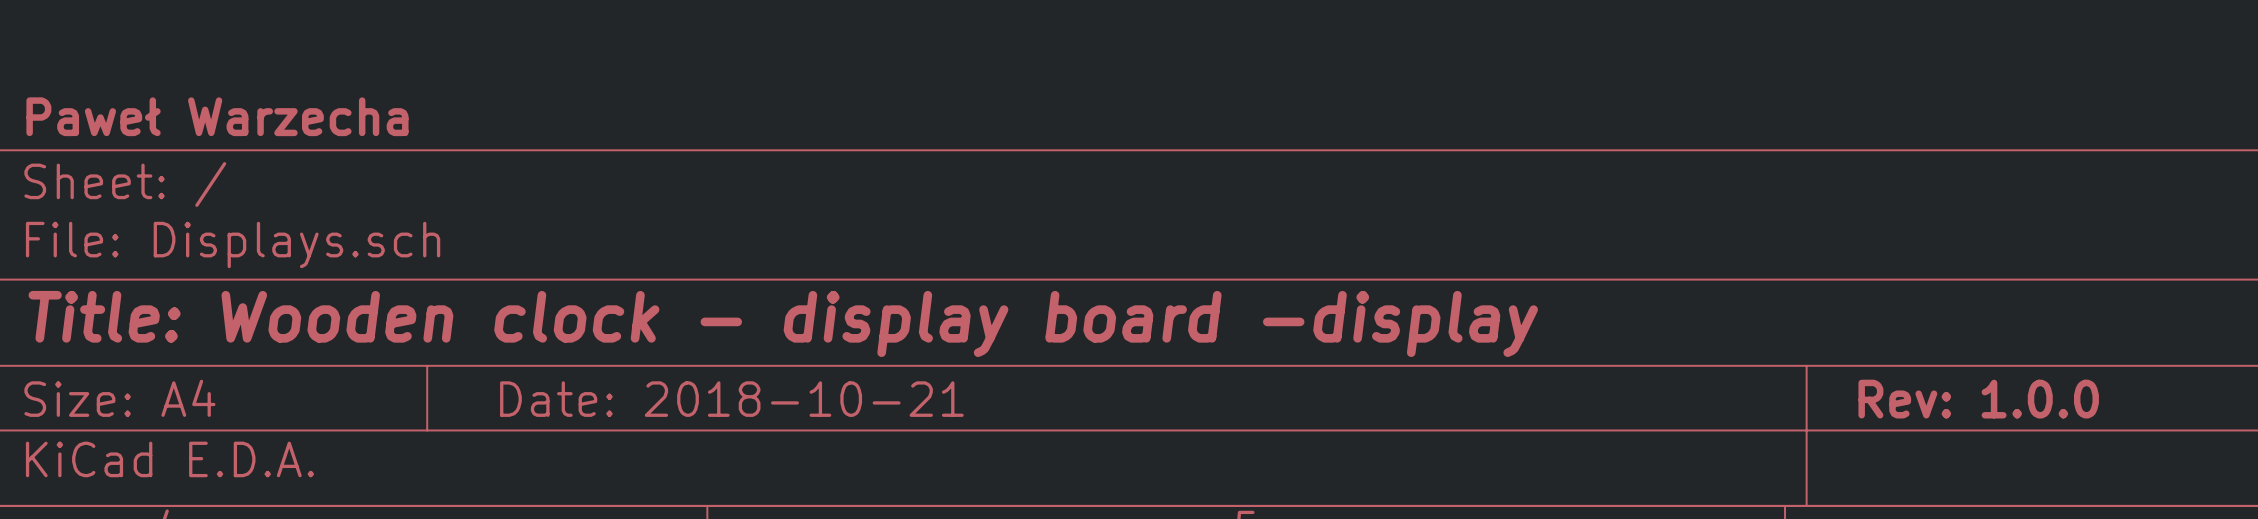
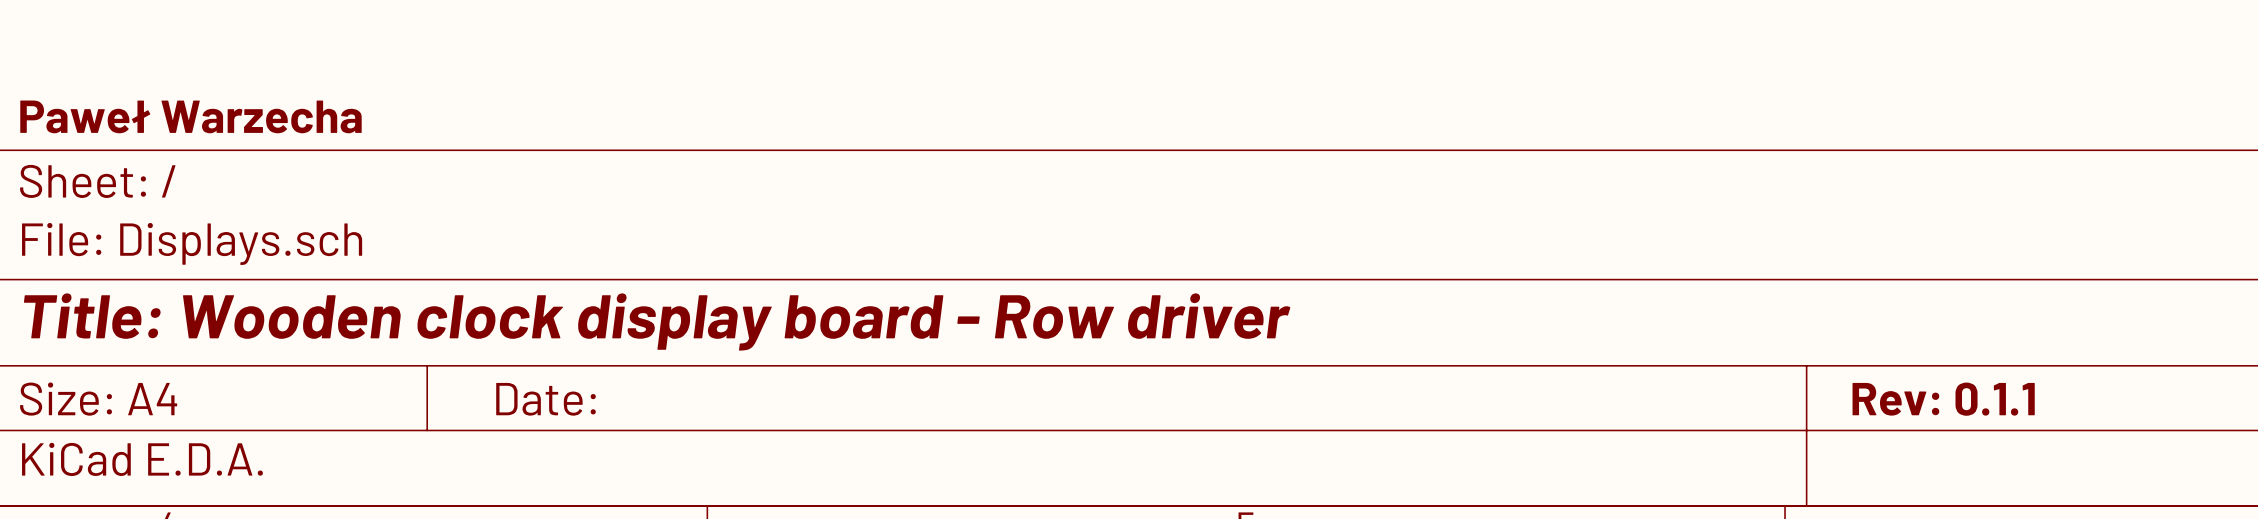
title block: Title: Wooden clock - display board -display (783, 323) -> Title: Wooden clock display board - Row driver (657, 321)
title block: Date: 2018-10-21 (731, 399) -> Date: (546, 399)
title block: Rev: 1.0.0 (1978, 399) -> Rev: 0.1.1 (1943, 399)

